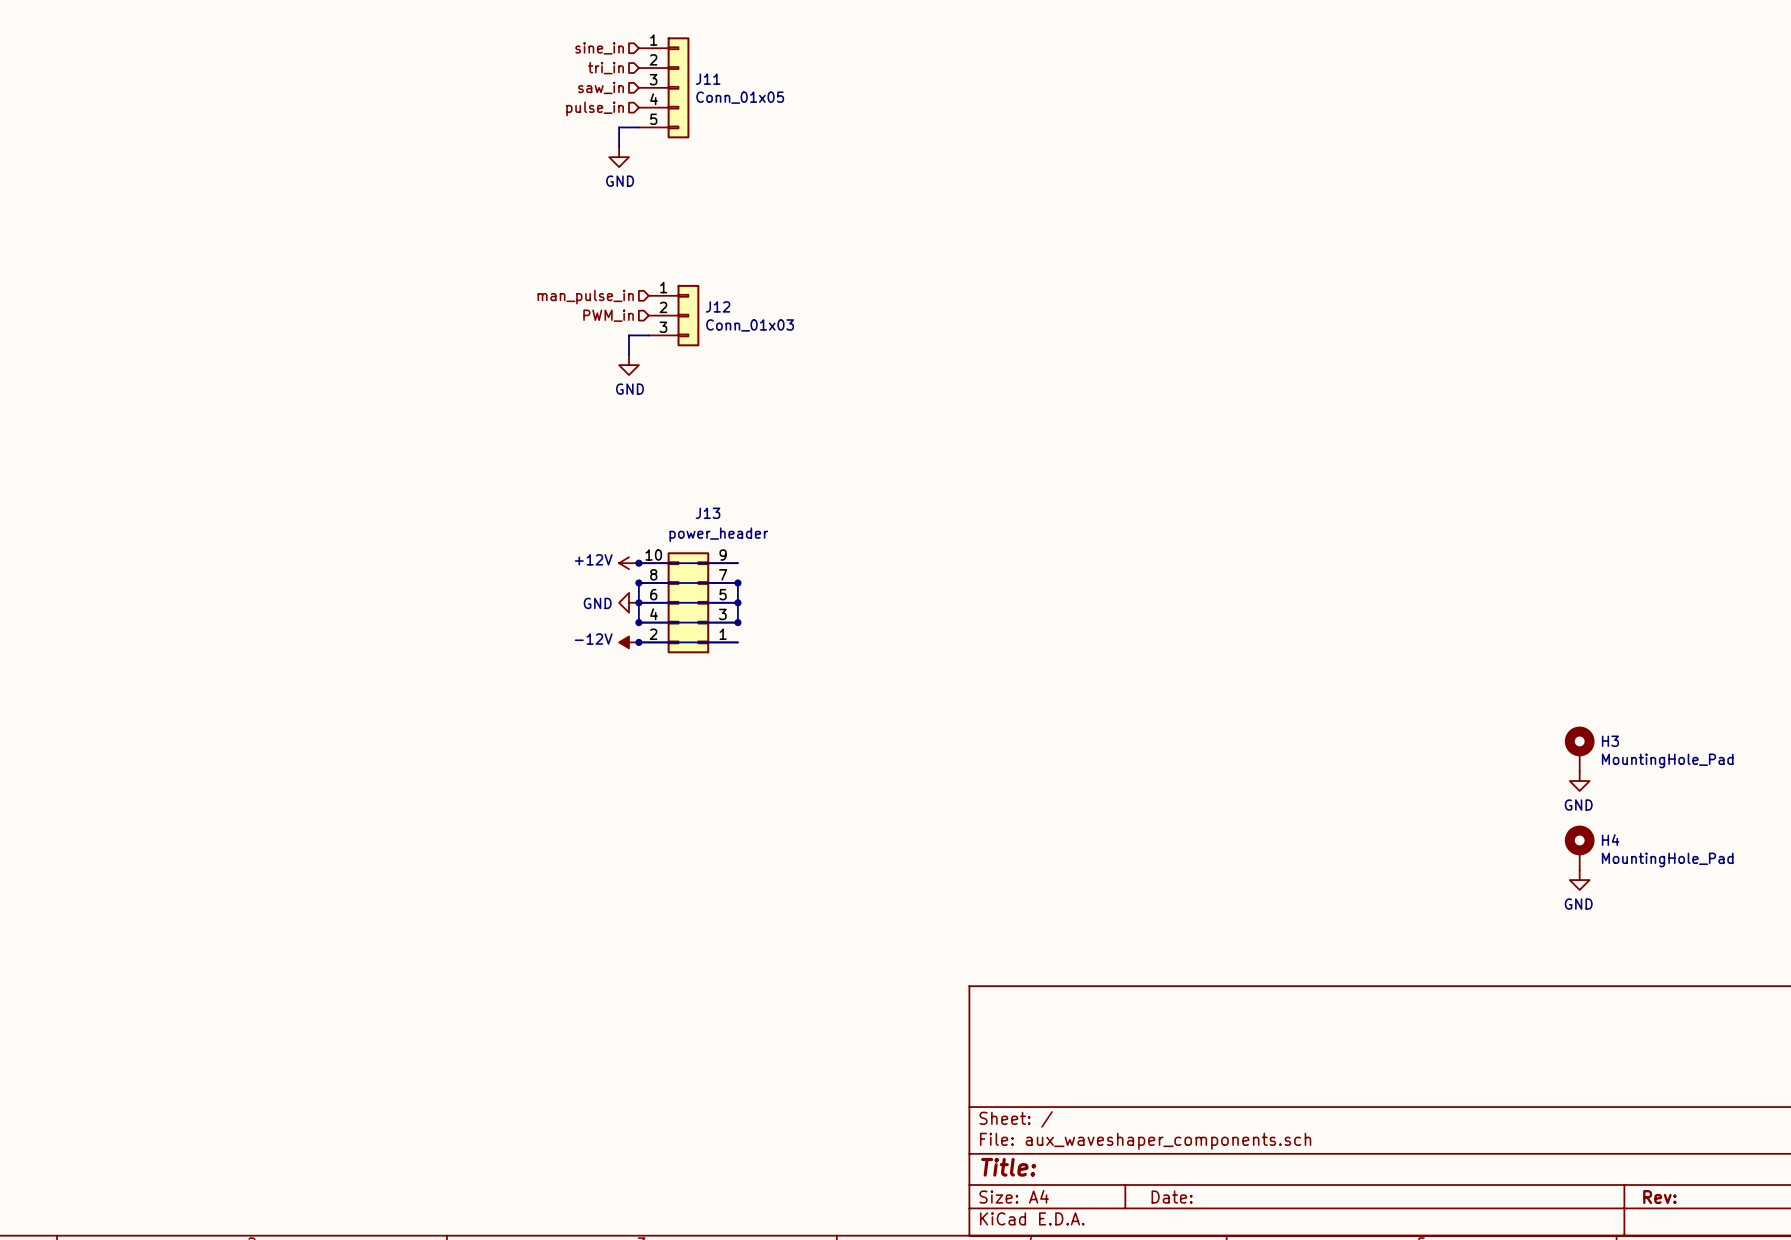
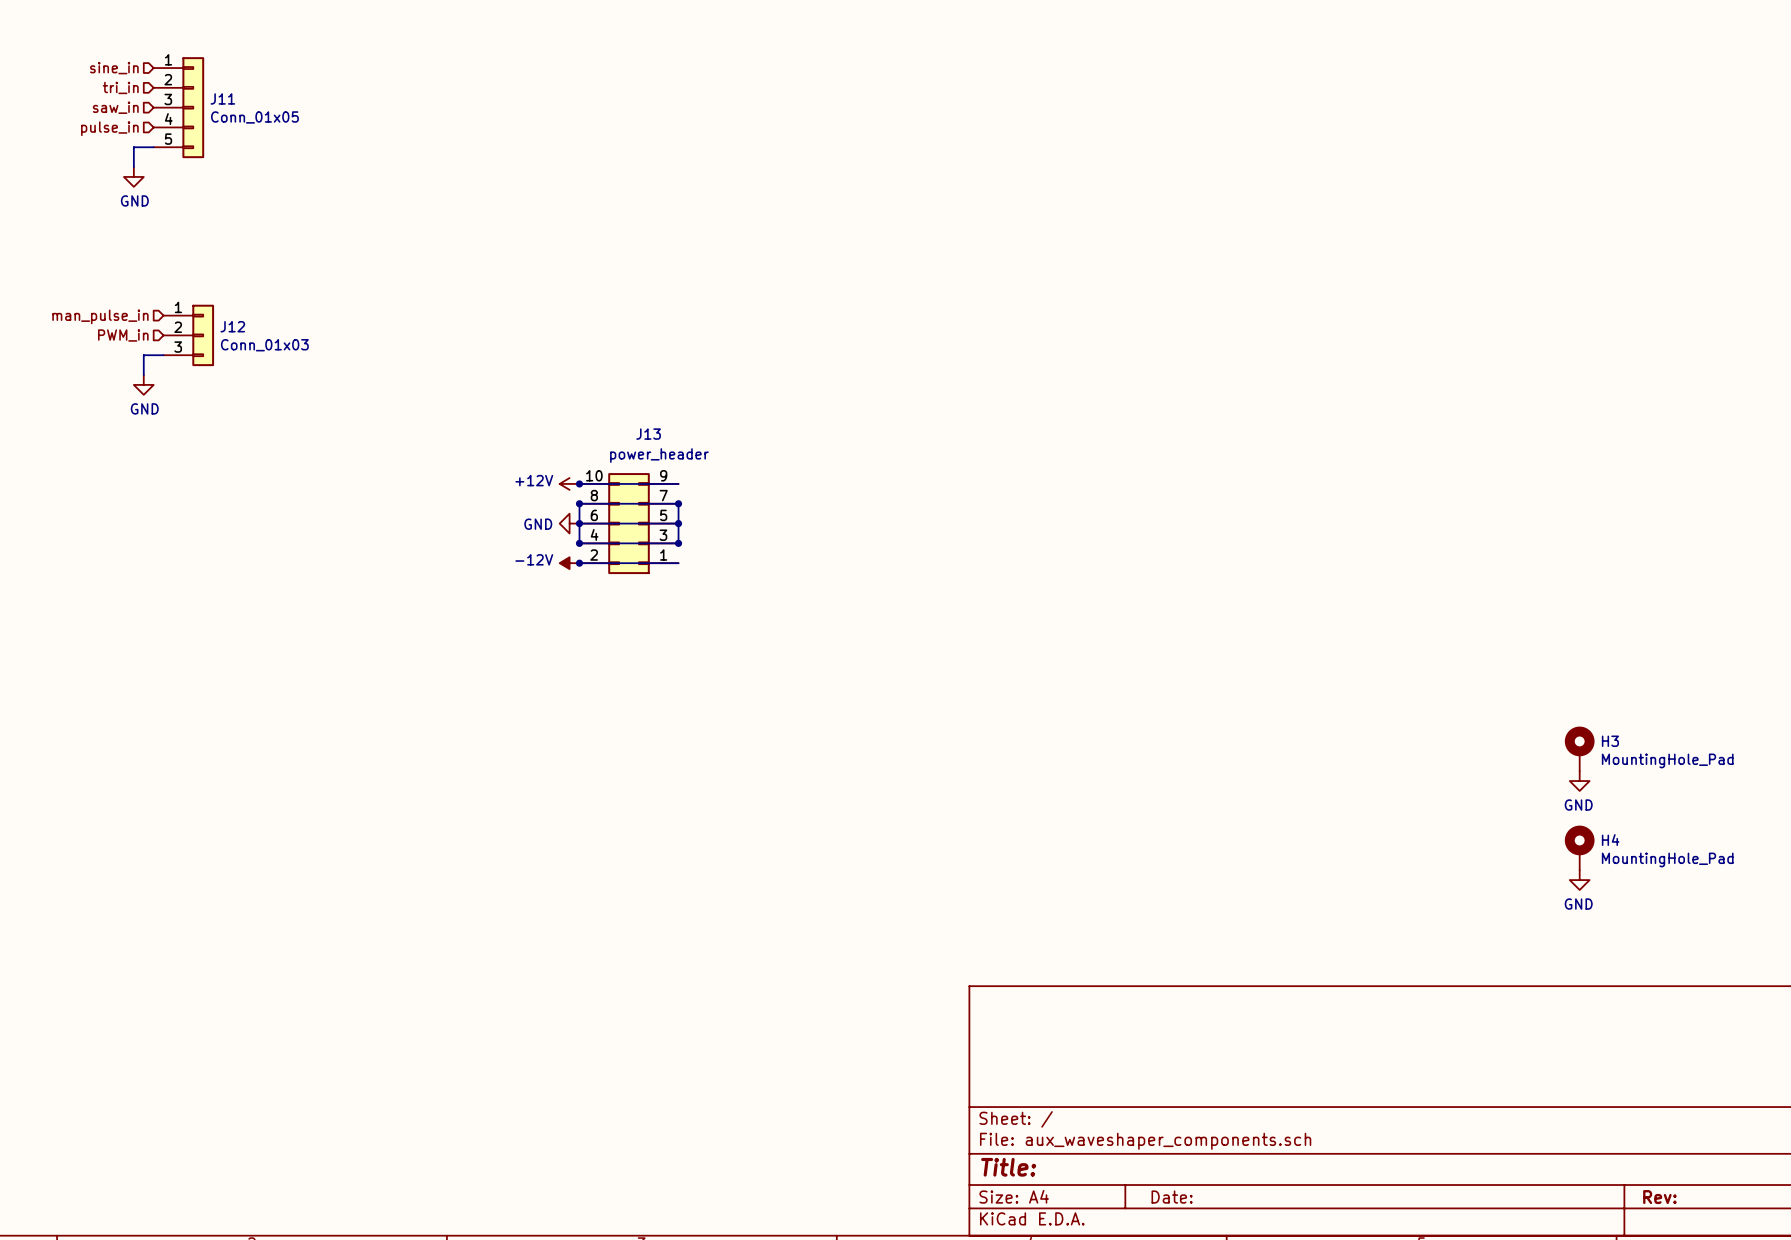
hierarchical label: sine_in (599, 48) -> none
hierarchical label: none -> sine_in (114, 68)
hierarchical label: tri_in (605, 68) -> none
hierarchical label: none -> tri_in (120, 87)
hierarchical label: saw_in (601, 87) -> none
J11 position: (664, 87) -> (178, 107)
hierarchical label: none -> saw_in (115, 107)
hierarchical label: pulse_in (595, 108) -> none
wire: (638, 127) (619, 127) (619, 147) -> none
hierarchical label: none -> pulse_in (109, 128)
wire: none -> (153, 147) (133, 147) (133, 167)
power symbol: GND (619, 157) -> none
power symbol: none -> GND (133, 176)
hierarchical label: man_pulse_in (585, 297) -> none
hierarchical label: PWM_in (608, 315) -> none
J12 position: (674, 315) -> (188, 335)
hierarchical label: none -> man_pulse_in (100, 316)
hierarchical label: none -> PWM_in (123, 335)
wire: (648, 335) (629, 335) (629, 355) -> none
wire: none -> (163, 355) (143, 355) (143, 375)
power symbol: GND (629, 365) -> none
power symbol: none -> GND (143, 384)
junction: none -> (579, 483)
junction: none -> (579, 503)
junction: none -> (678, 503)
power symbol: none -> GND (569, 523)
junction: none -> (579, 523)
junction: none -> (678, 523)
junction: none -> (579, 543)
junction: none -> (678, 543)
junction: none -> (579, 563)
power symbol position: +12V (629, 563) -> +12V (569, 483)
junction: (638, 563) -> none
wire: (678, 563) (737, 563) -> (579, 563) (638, 563)
wire: (638, 582) (638, 622) (737, 622) (737, 582) (638, 582) -> (579, 503) (579, 543) (678, 543) (678, 503) (579, 503)
junction: (638, 582) -> none
junction: (737, 582) -> none
power symbol: GND (629, 602) -> none
wire: (638, 602) (737, 602) -> (579, 523) (678, 523)
junction: (638, 602) -> none
J13 position: (688, 602) -> (629, 523)
junction: (737, 602) -> none
junction: (638, 622) -> none
junction: (737, 622) -> none
power symbol position: -12V (629, 642) -> -12V (569, 563)
wire: (638, 642) (737, 642) -> (579, 483) (678, 483)
junction: (638, 642) -> none

